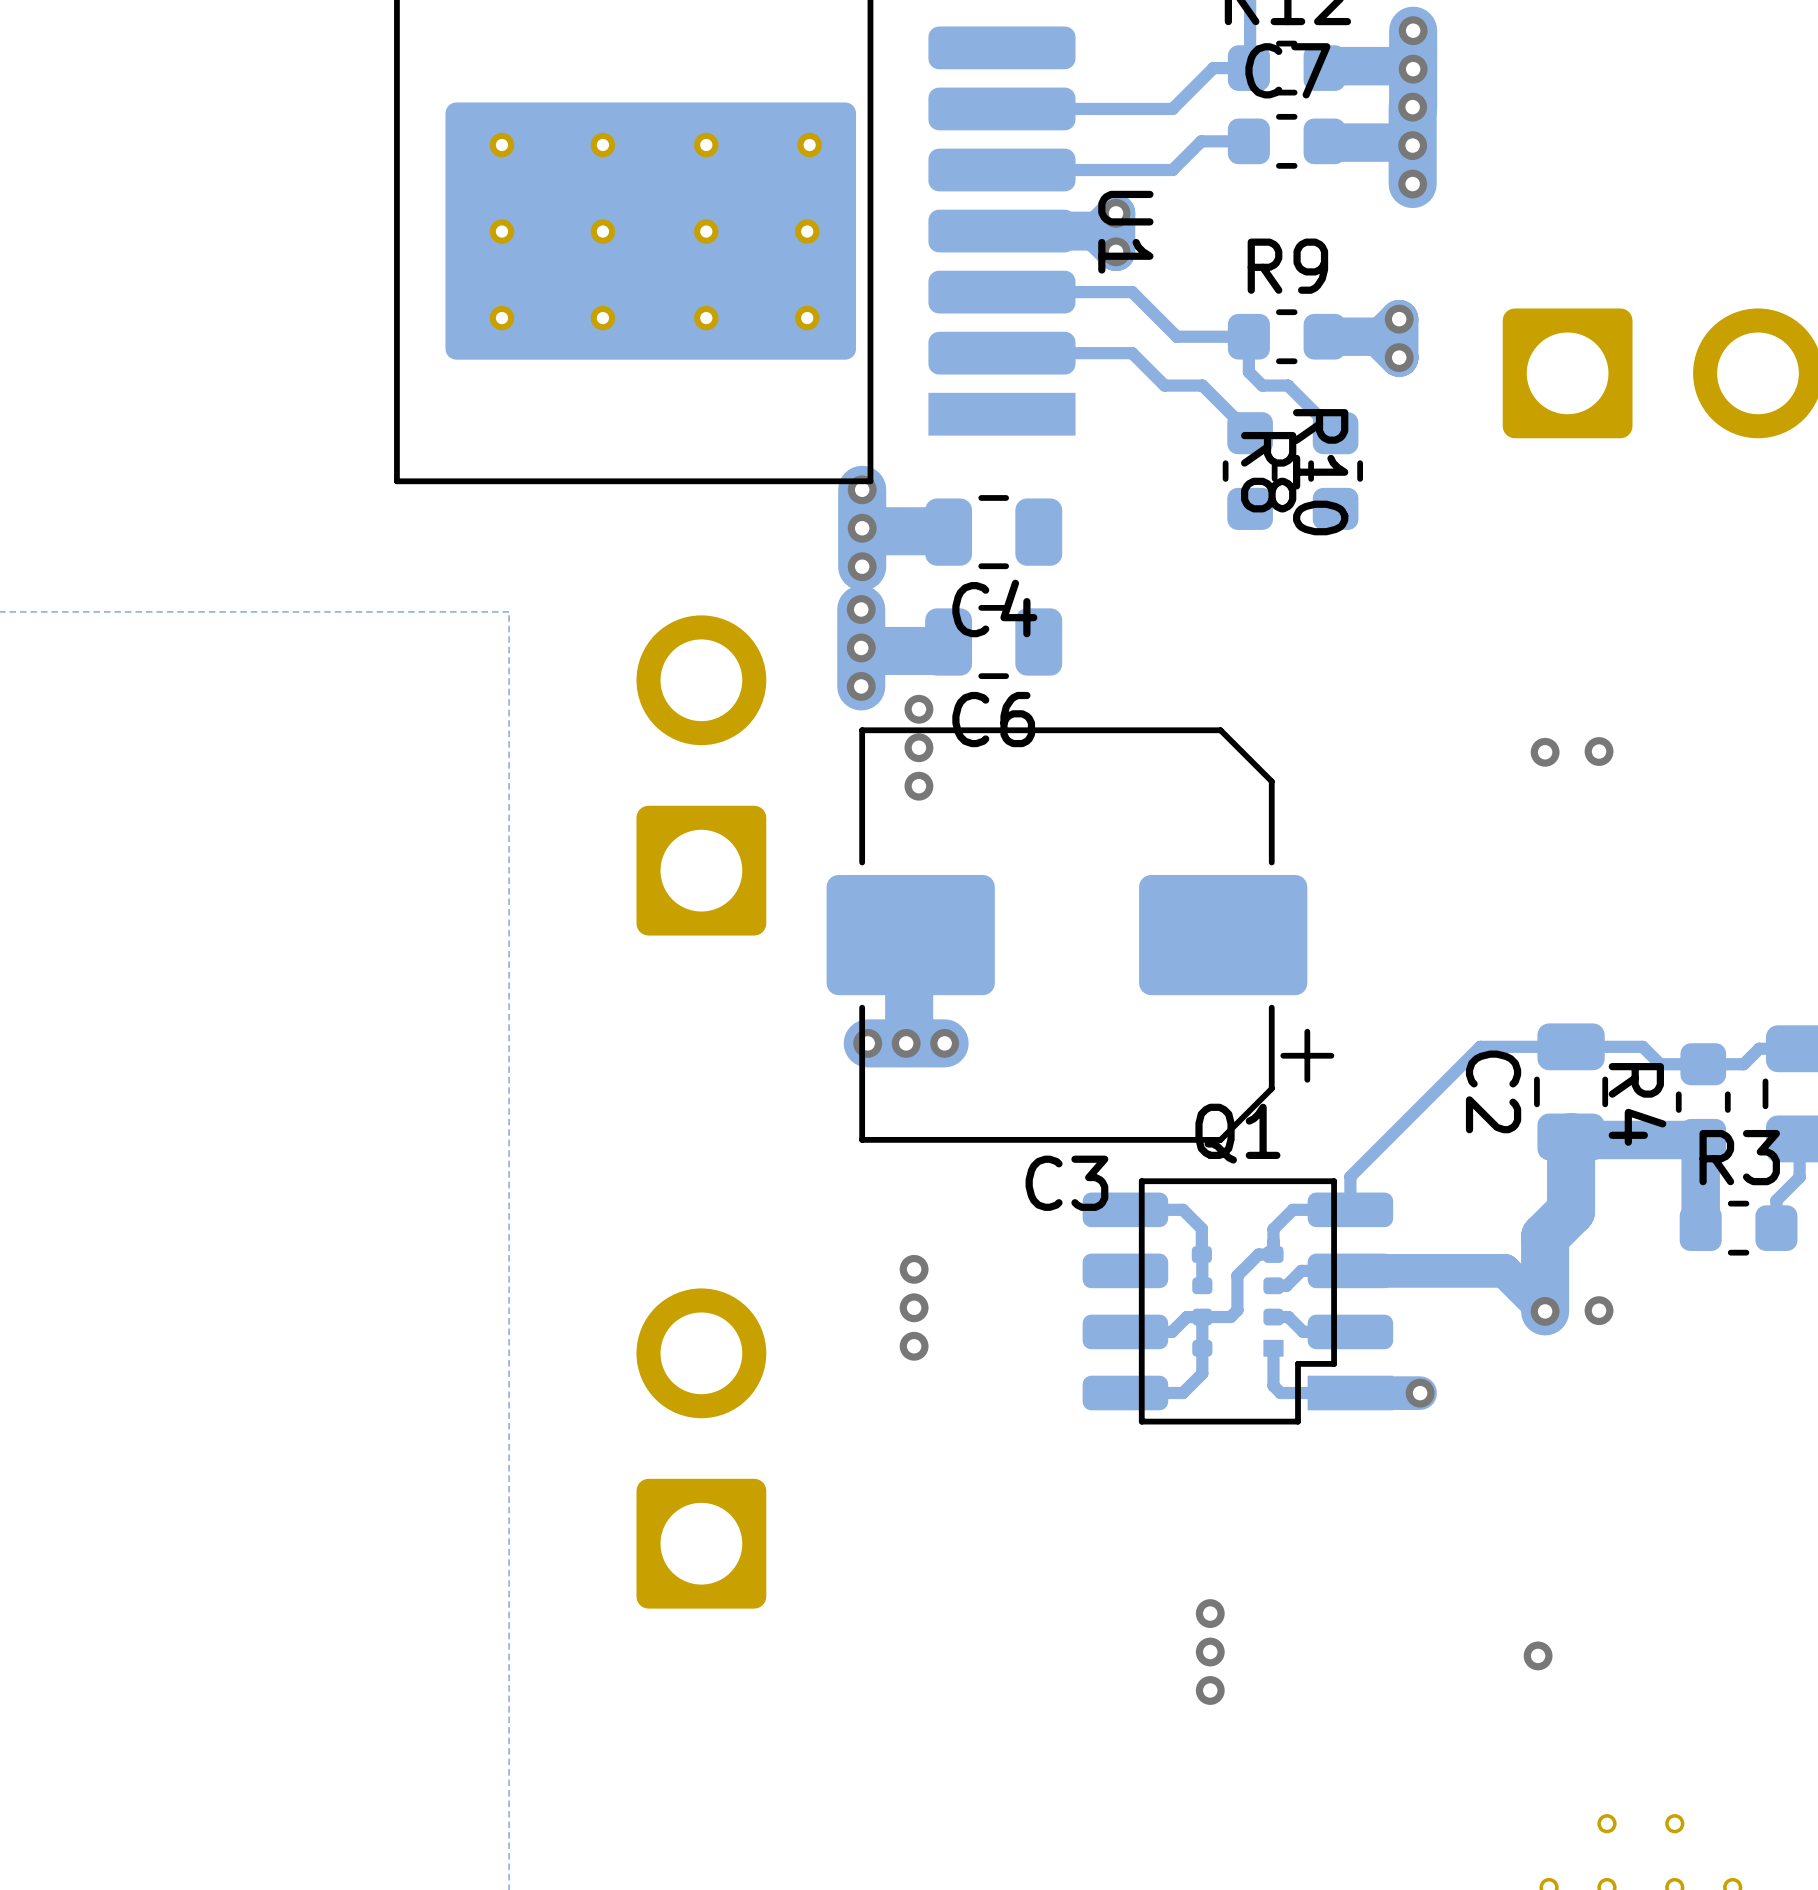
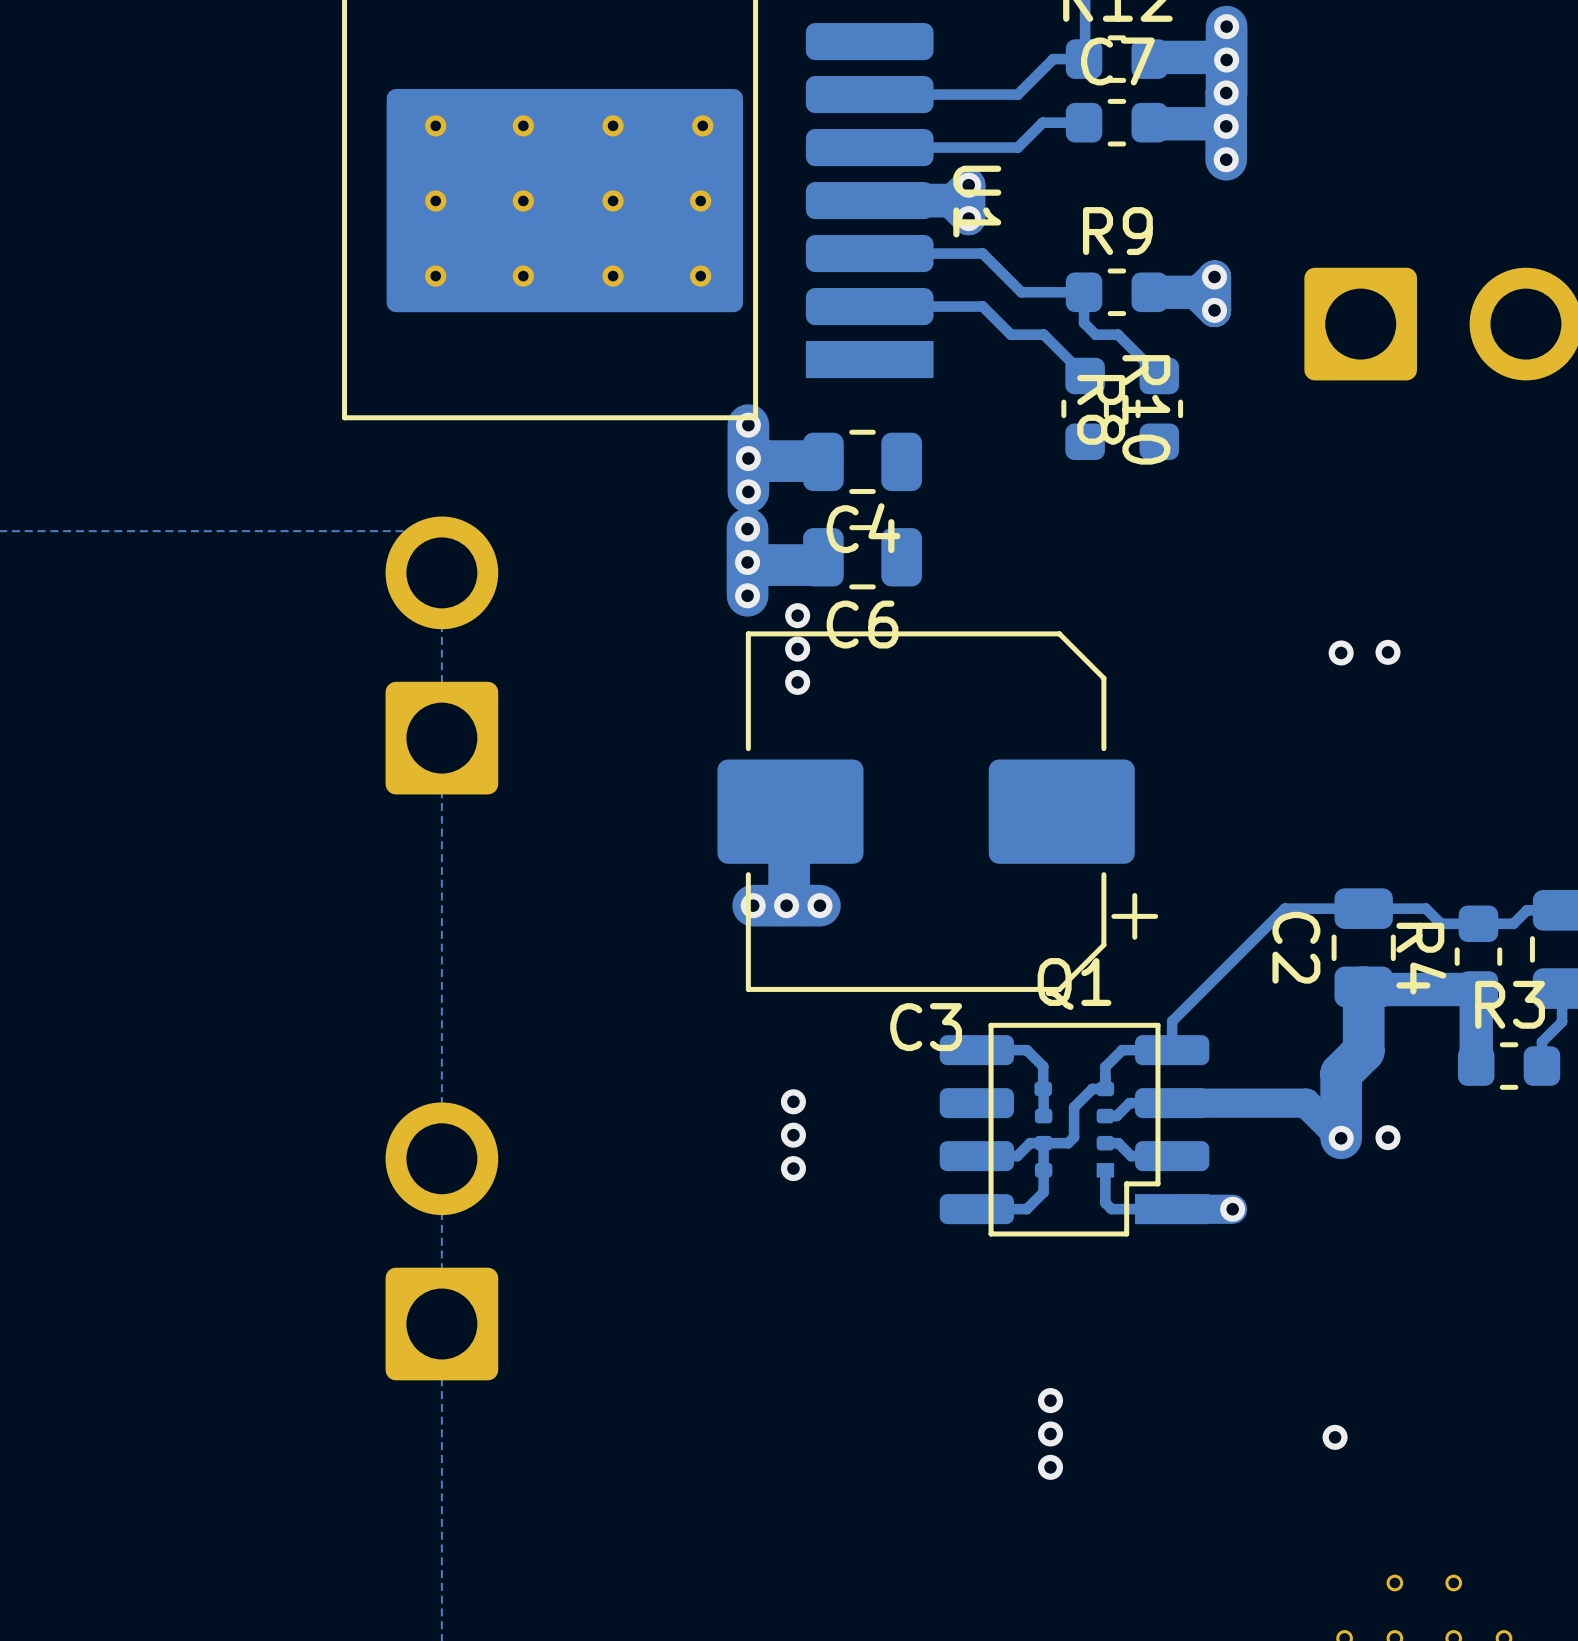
part position: (701, 775) -> (441, 655)
part position: (701, 1448) -> (441, 1241)

